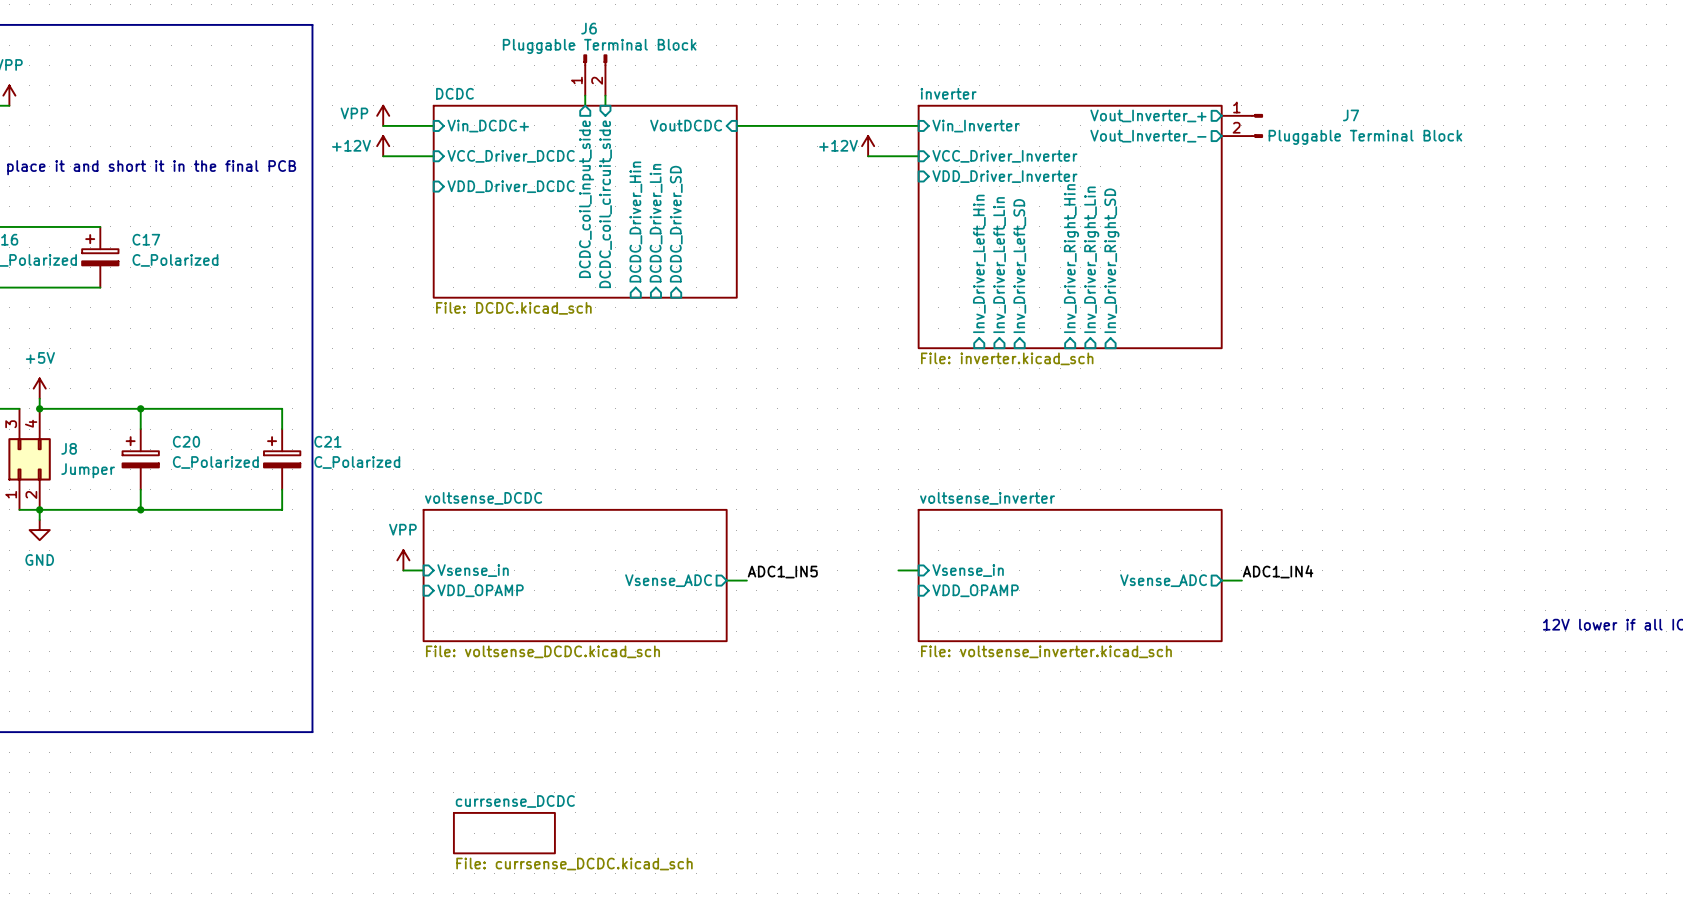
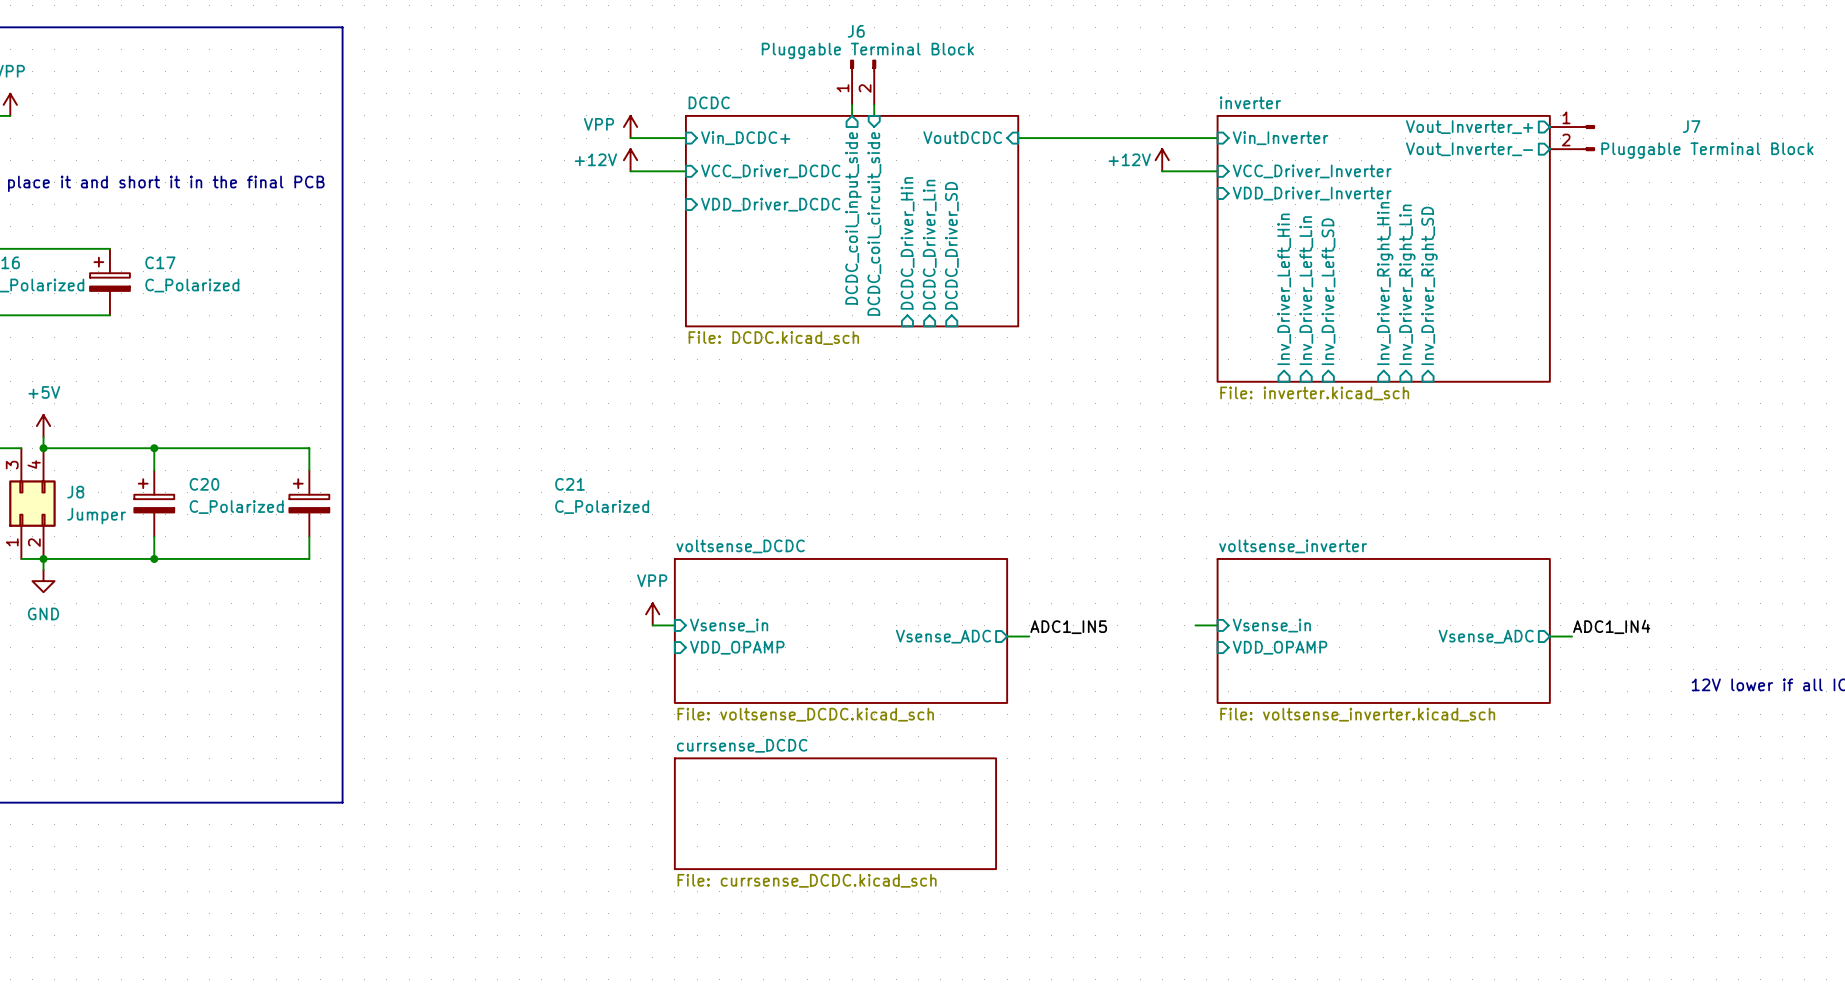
J6 position: (595, 75) -> (863, 82)
wire: (585, 95) (585, 105) -> (852, 104) (852, 115)
wire: (605, 95) (605, 105) -> (874, 104) (874, 115)
power symbol position: VPP (383, 115) -> VPP (630, 127)
sheet pin position: Vout_Inverter_+ (1148, 115) -> Vout_Inverter_+ (1469, 127)
wire: (383, 125) (433, 125) -> (630, 138) (685, 138)
sheet pin position: VoutDCDC (686, 125) -> VoutDCDC (962, 137)
wire: (736, 125) (918, 125) -> (1018, 138) (1217, 138)
J7 position: (1242, 125) -> (1572, 138)
sheet pin position: Vin_DCDC+ (488, 126) -> Vin_DCDC+ (745, 138)
sheet pin position: Vin_Inverter (976, 126) -> Vin_Inverter (1280, 138)
sheet pin position: Vout_Inverter_- (1148, 136) -> Vout_Inverter_- (1469, 149)
power symbol: +12V (383, 146) -> none
power symbol: none -> +12V (630, 160)
power symbol: +12V (868, 146) -> none
power symbol: none -> +12V (1162, 160)
wire: (383, 156) (433, 156) -> (630, 171) (685, 171)
sheet pin position: VCC_Driver_DCDC (511, 156) -> VCC_Driver_DCDC (770, 171)
wire: (868, 156) (918, 156) -> (1162, 171) (1217, 171)
sheet pin position: VCC_Driver_Inverter (1004, 156) -> VCC_Driver_Inverter (1312, 171)
sheet pin position: VDD_Driver_Inverter (1004, 176) -> VDD_Driver_Inverter (1312, 193)
sheet pin position: VDD_Driver_DCDC (511, 186) -> VDD_Driver_DCDC (770, 204)
sheet pin position: DCDC_coil_input_side (586, 199) -> DCDC_coil_input_side (853, 218)
sheet DCDC position: (585, 201) -> (852, 221)
sheet pin position: DCDC_coil_circuit_side (605, 204) -> DCDC_coil_circuit_side (874, 223)
sheet pin position: DCDC_Driver_Hin (635, 222) -> DCDC_Driver_Hin (907, 243)
sheet pin position: DCDC_Driver_Lin (656, 223) -> DCDC_Driver_Lin (929, 244)
sheet pin position: DCDC_Driver_SD (676, 224) -> DCDC_Driver_SD (951, 245)
sheet inverter position: (1070, 226) -> (1383, 248)
sheet pin position: Inv_Driver_Right_Hin (1071, 258) -> Inv_Driver_Right_Hin (1385, 283)
sheet pin position: Inv_Driver_Right_Lin (1091, 259) -> Inv_Driver_Right_Lin (1407, 284)
sheet pin position: Inv_Driver_Right_SD (1111, 260) -> Inv_Driver_Right_SD (1429, 285)
sheet pin position: Inv_Driver_Left_Hin (979, 263) -> Inv_Driver_Left_Hin (1284, 289)
sheet pin position: Inv_Driver_Left_Lin (999, 265) -> Inv_Driver_Left_Lin (1306, 290)
sheet pin position: Inv_Driver_Left_SD (1019, 266) -> Inv_Driver_Left_SD (1328, 291)
C21 name position: C21 (327, 441) -> C21 (569, 484)
C21 value position: C_Polarized (357, 462) -> C_Polarized (602, 507)
power symbol position: VPP (403, 560) -> VPP (652, 614)
wire: (403, 570) (423, 570) -> (652, 625) (674, 625)
sheet pin: Vsense_in (473, 570) -> none
wire: (898, 570) (918, 570) -> (1195, 625) (1217, 625)
sheet pin: Vsense_in (968, 570) -> none
label position: ADC1_IN4 (1278, 571) -> ADC1_IN4 (1611, 626)
label position: ADC1_IN5 (782, 572) -> ADC1_IN5 (1068, 627)
sheet voltsense_DCDC position: (575, 575) -> (841, 630)
sheet voltsense_inverter position: (1070, 575) -> (1383, 630)
sheet pin shape: output (668, 580) -> input (729, 625)
sheet pin: Vsense_ADC (668, 580) -> Vsense_in (729, 625)
wire: (726, 580) (746, 580) -> (1007, 636) (1029, 636)
sheet pin: none -> Vsense_ADC (943, 636)
sheet pin shape: output (1163, 580) -> input (1271, 625)
sheet pin: Vsense_ADC (1163, 580) -> Vsense_in (1271, 625)
wire: (1221, 580) (1241, 580) -> (1549, 636) (1572, 636)
sheet pin: none -> Vsense_ADC (1486, 636)
sheet pin: VDD_OPAMP (480, 590) -> none
sheet pin: none -> VDD_OPAMP (737, 647)
sheet pin: VDD_OPAMP (975, 590) -> none
sheet pin: none -> VDD_OPAMP (1280, 647)
sheet currsense_DCDC: none -> File: currsense_DCDC.kicad_sch (835, 813)
sheet currsense_DCDC: File: currsense_DCDC.kicad_sch (504, 833) -> none

